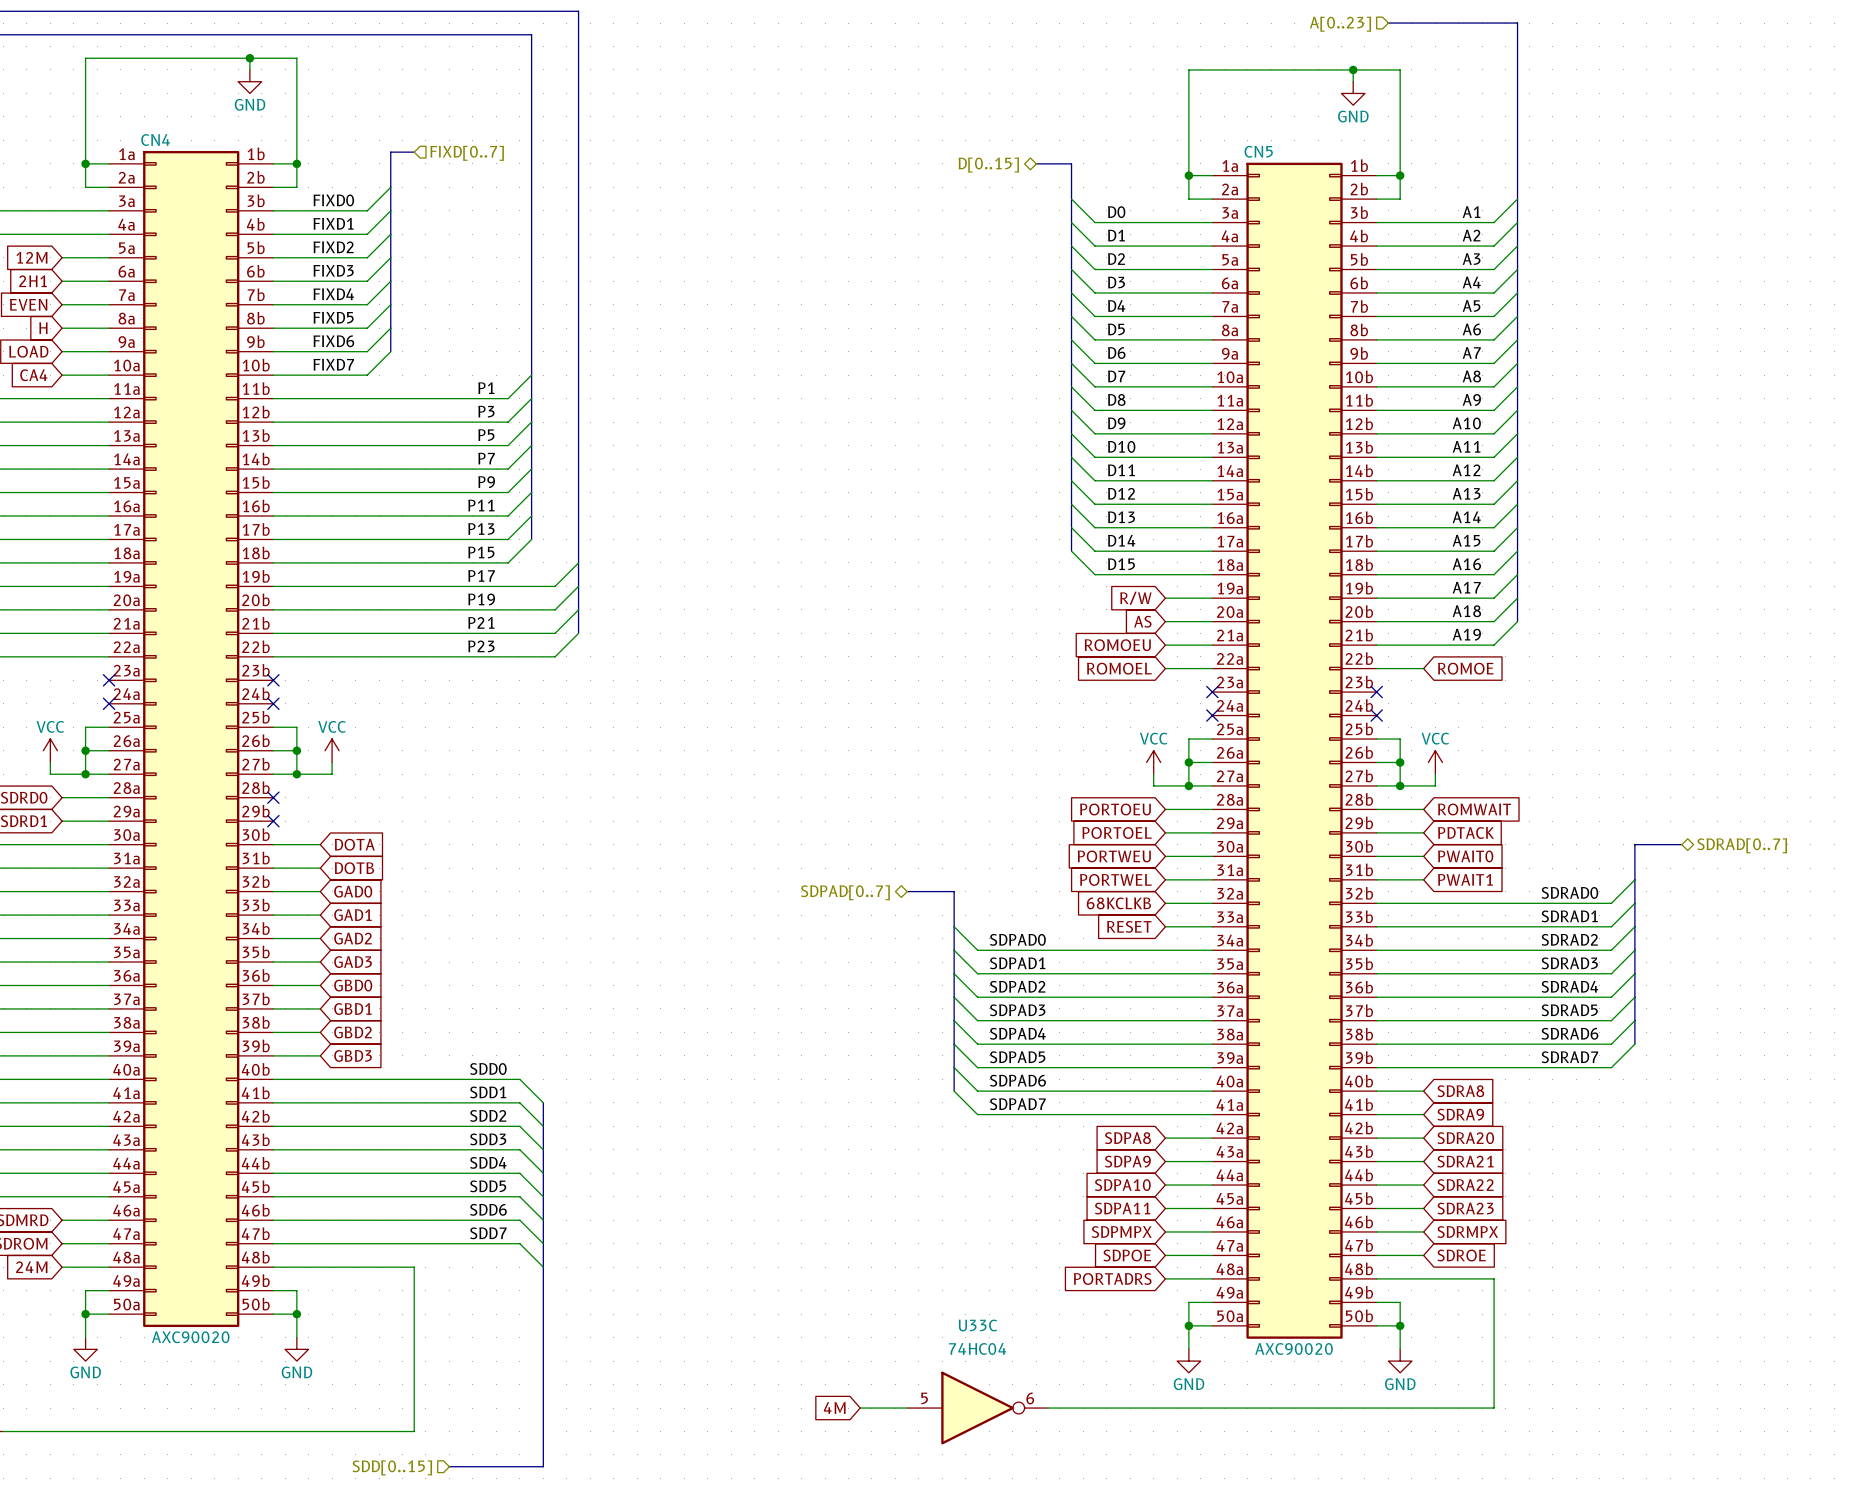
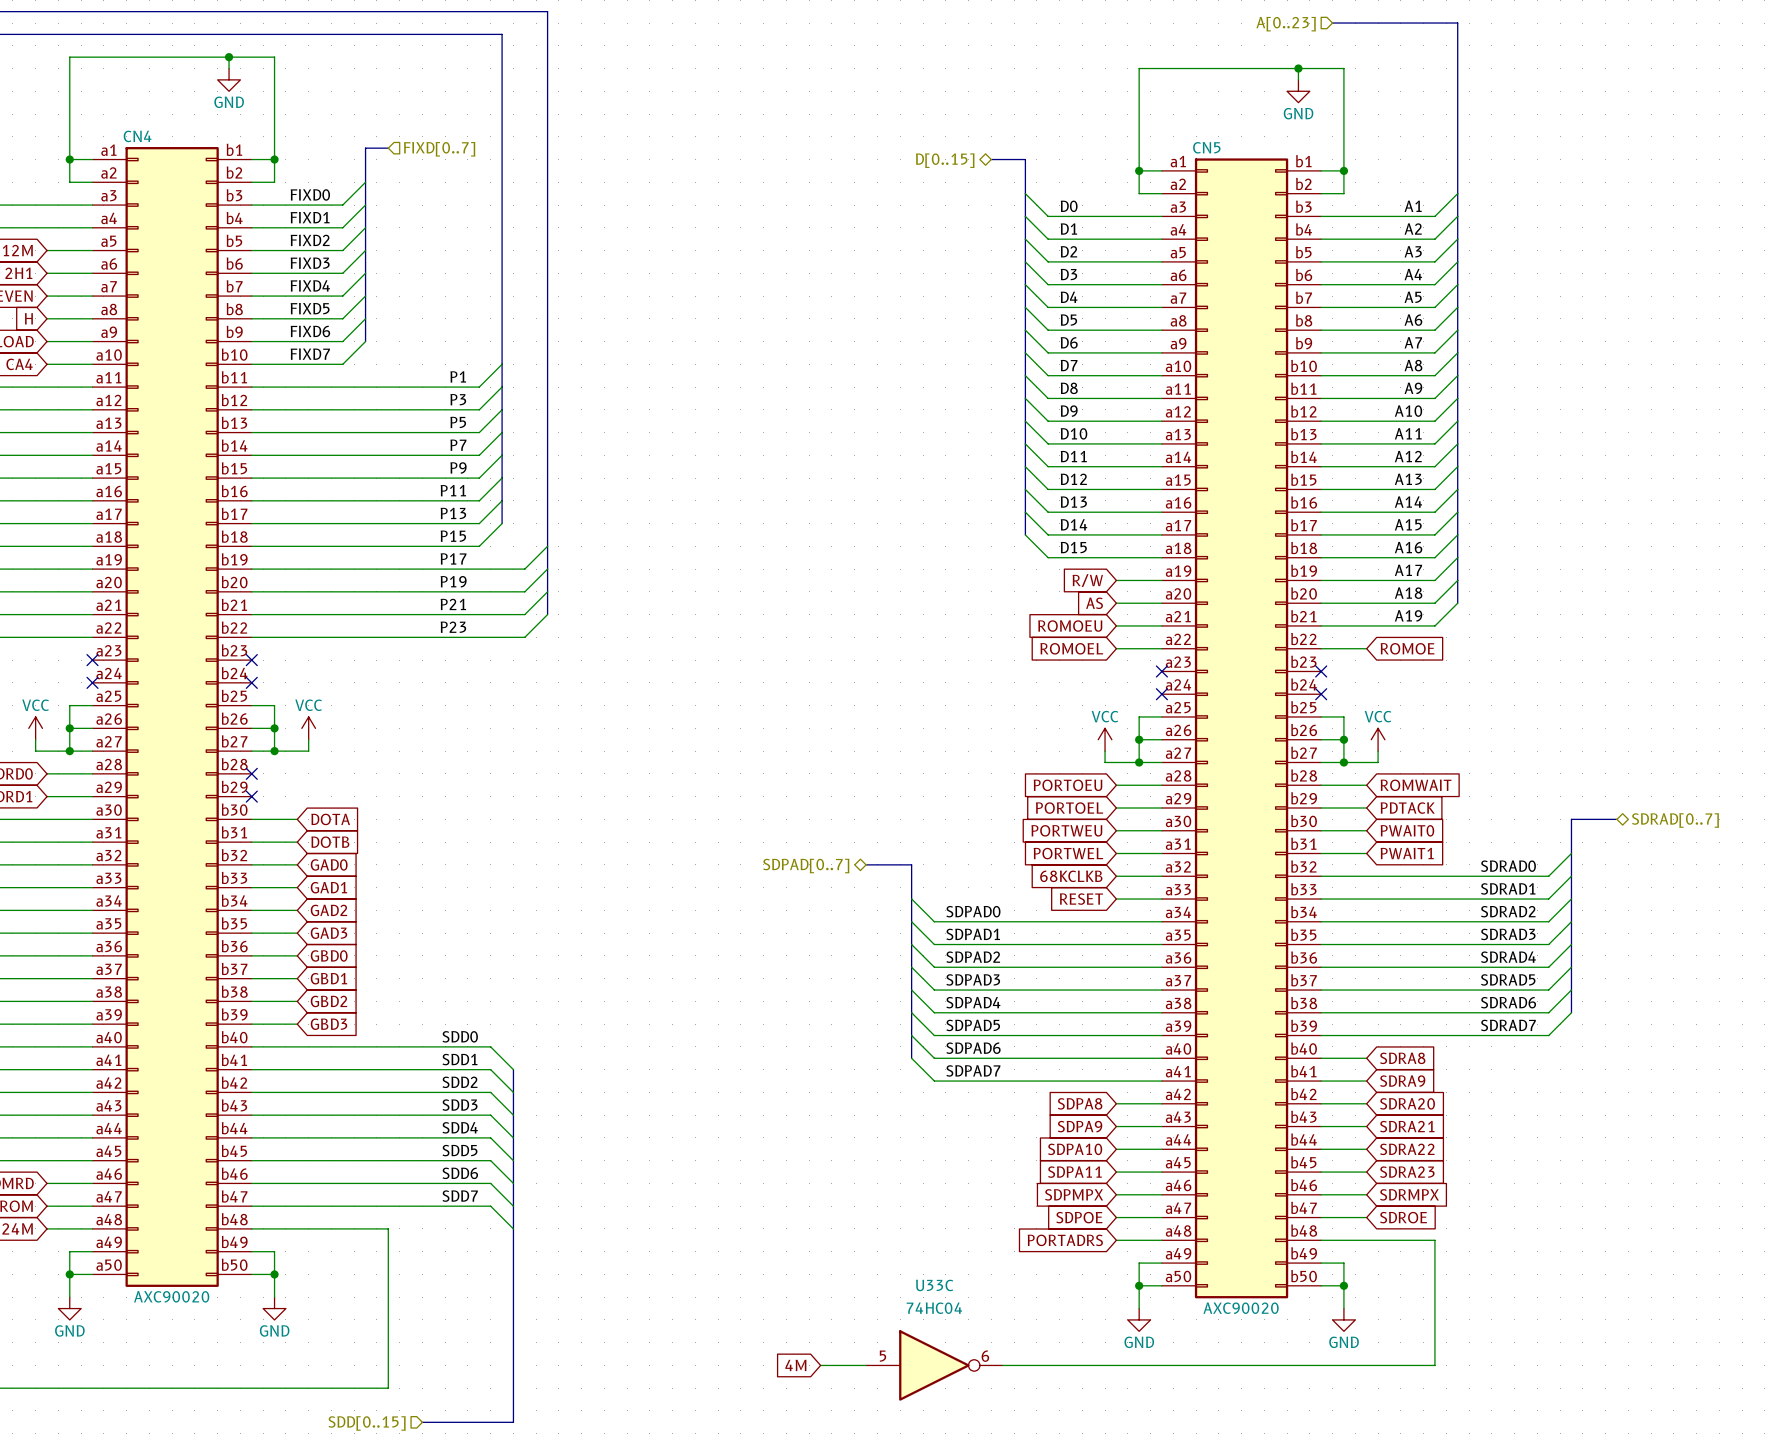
CN4 symbol: [109, 150, 274, 1328] -> [92, 147, 252, 1287]
CN5 symbol: [1212, 162, 1377, 1339] -> [1161, 158, 1322, 1299]

